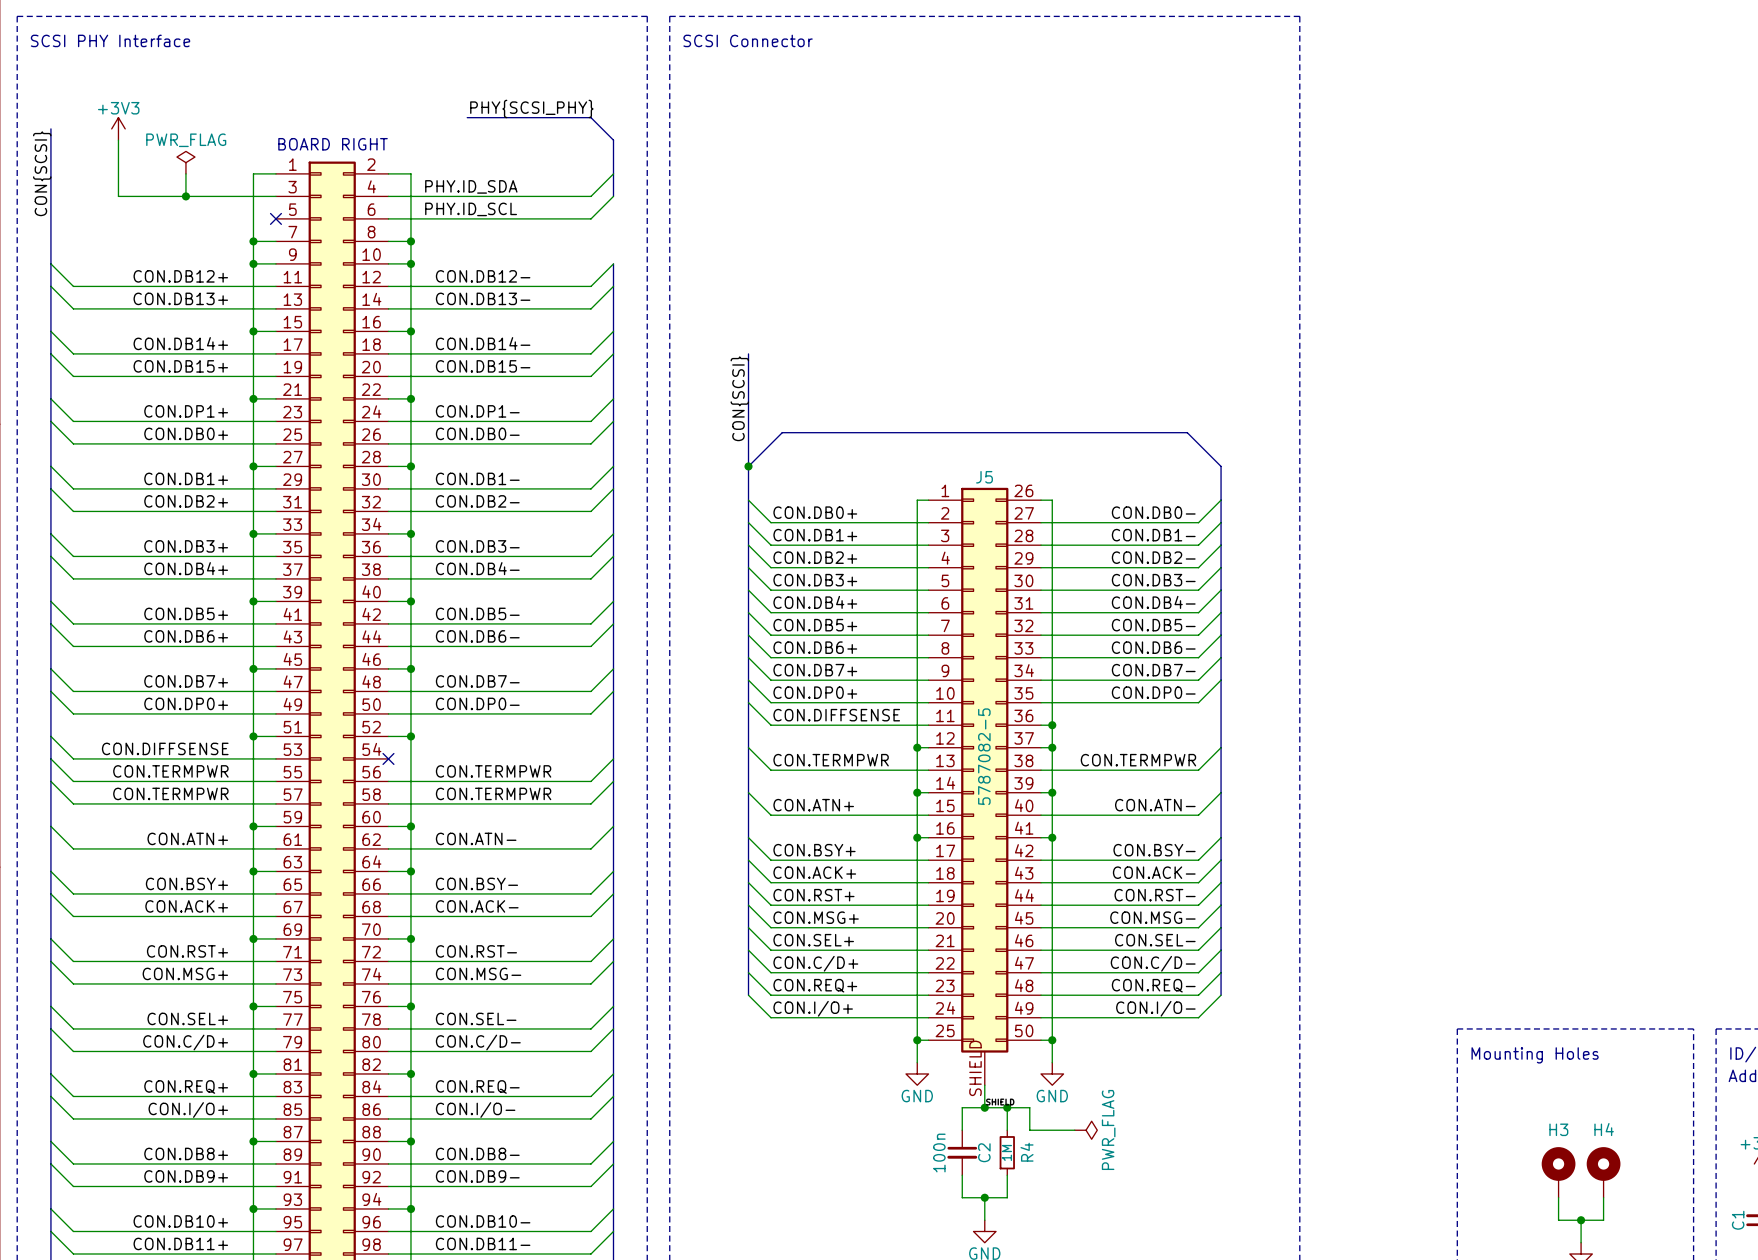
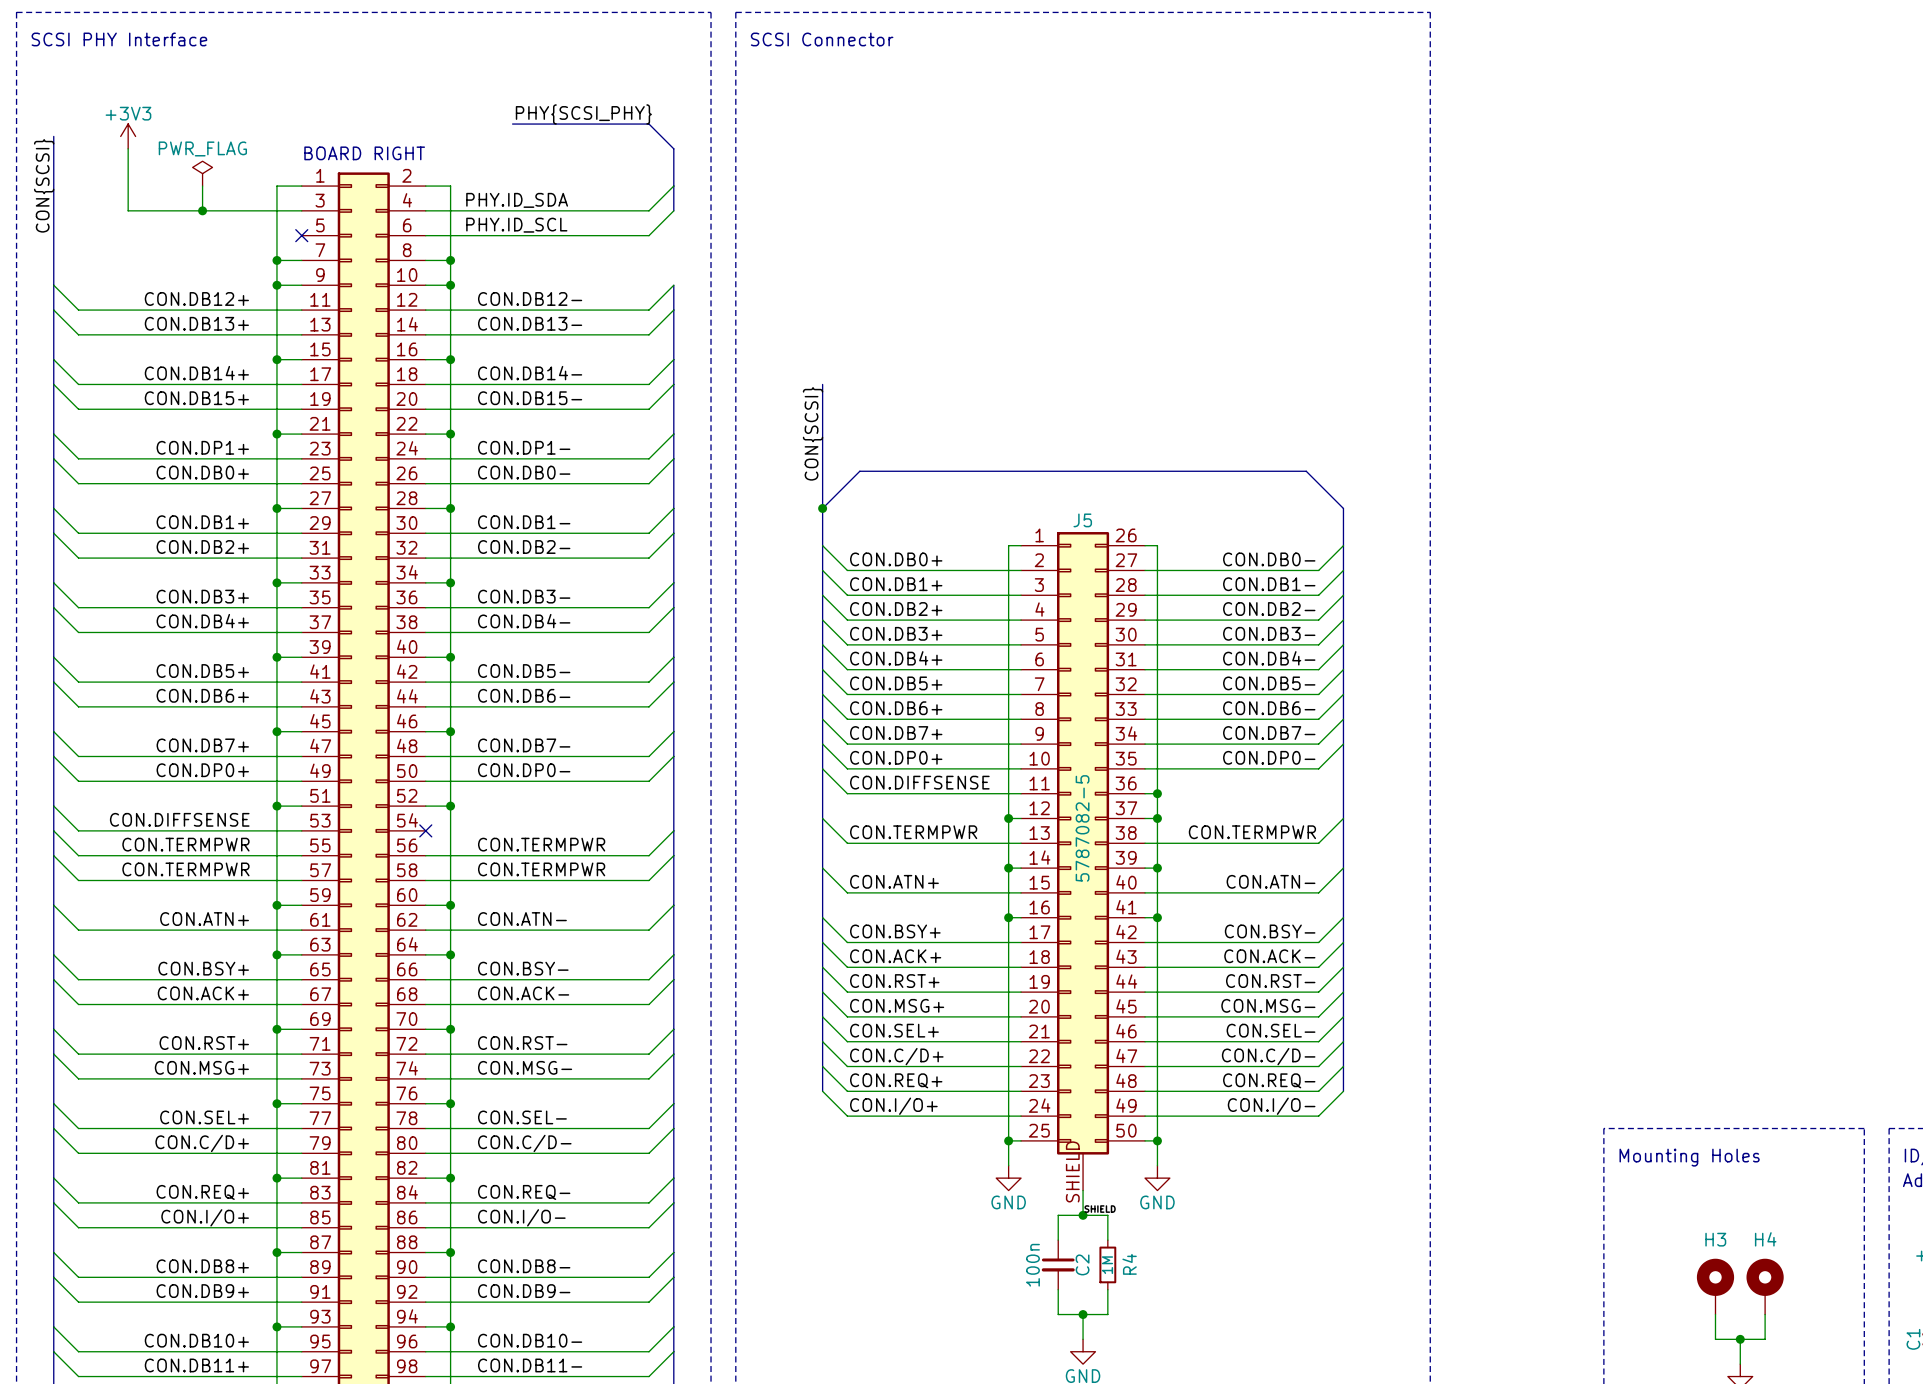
wire: (1007, 1107) (1029, 1107) (1029, 1130) (1074, 1130) -> none
junction: (1007, 1107) -> none
power symbol: PWR_FLAG (1086, 1130) -> none

